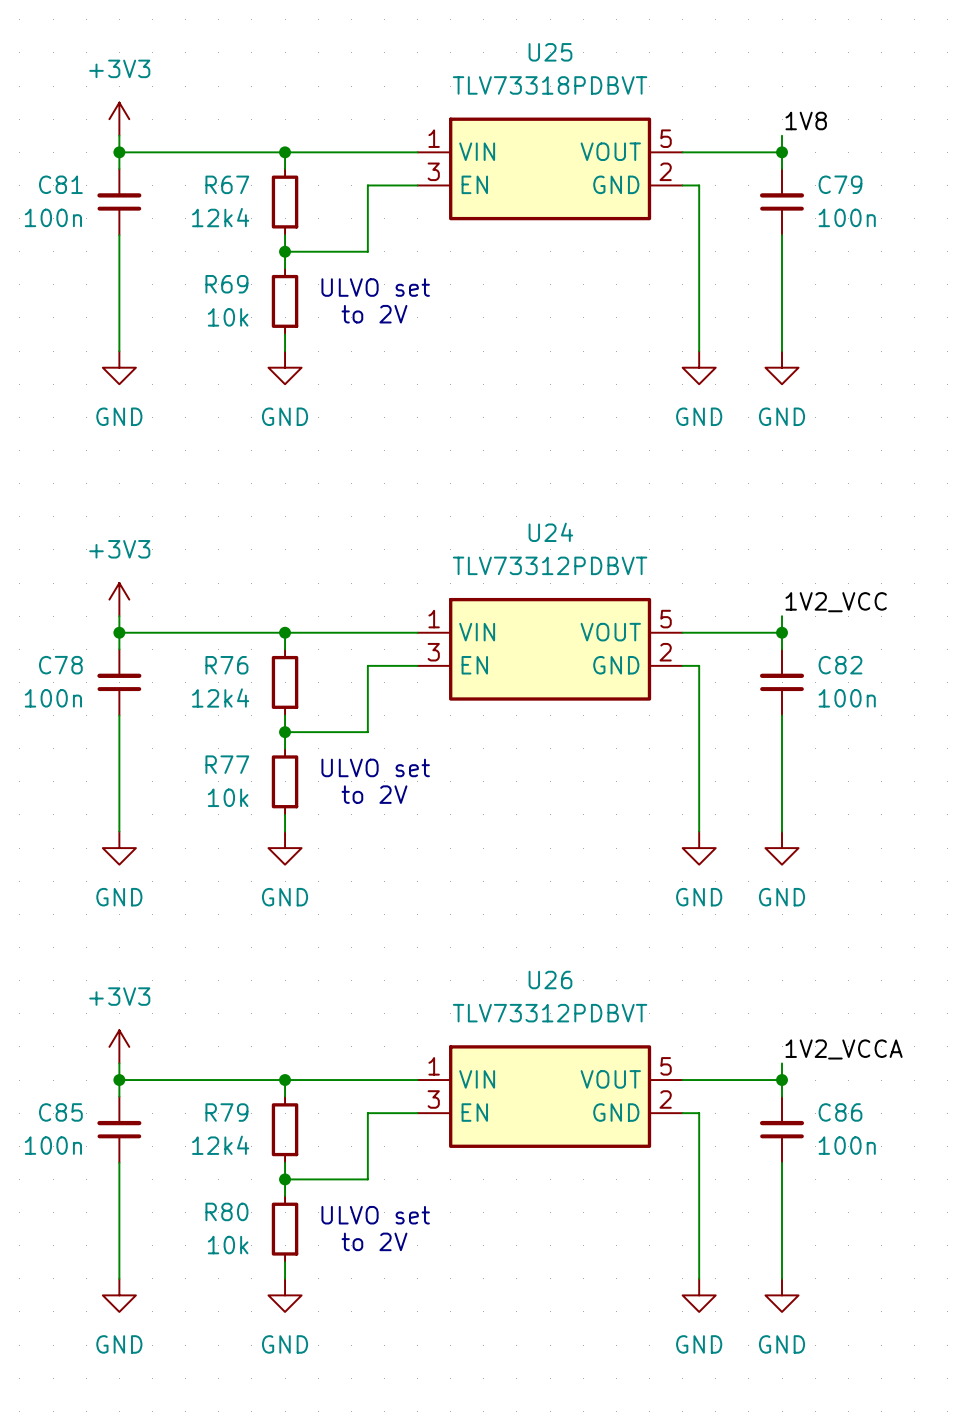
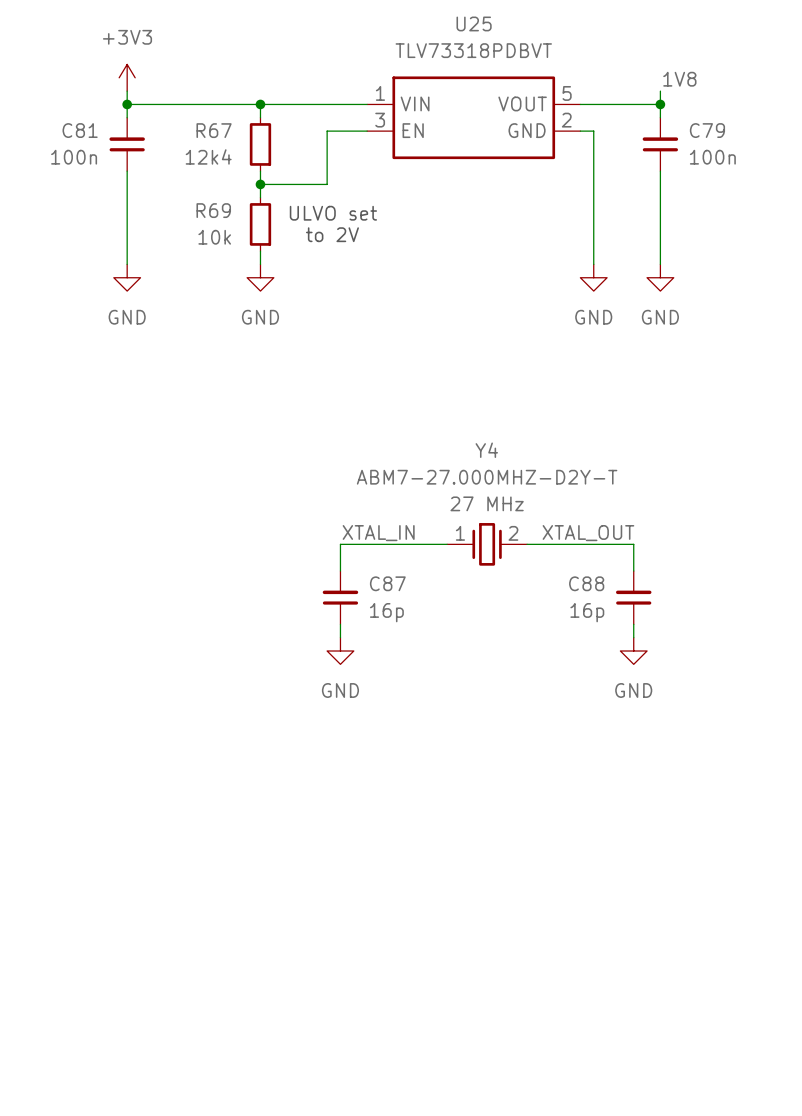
power symbol: +3V3 (119, 599) -> none
label: 1V2_VCC (836, 602) -> none
wire: (119, 616) (119, 649) -> none
wire: (782, 616) (782, 649) -> none
wire: (119, 632) (417, 632) -> none
junction: (119, 632) -> none
wire: (285, 632) (285, 649) -> none
junction: (285, 632) -> none
wire: (682, 632) (782, 632) -> none
junction: (782, 632) -> none
U24: (550, 649) -> none
wire: (417, 665) (367, 665) (367, 732) (285, 732) -> none
wire: (682, 665) (699, 665) (699, 831) -> none
C78: (119, 682) -> none
R76: (285, 682) -> none
C82: (782, 682) -> none
label: none -> XTAL_IN (378, 533)
label: none -> XTAL_OUT (588, 533)
wire: none -> (447, 544) (340, 544) (340, 571)
Y4: none -> (487, 544)
wire: none -> (527, 544) (633, 544) (633, 571)
wire: (119, 715) (119, 831) -> none
wire: (285, 715) (285, 748) -> none
wire: (782, 715) (782, 831) -> none
junction: (285, 732) -> none
C87: none -> (340, 597)
C88: none -> (633, 597)
text: ULVO set (375, 767) -> none
R77: (285, 781) -> none
text: to 2V (374, 794) -> none
wire: none -> (633, 624) (633, 637)
wire: (285, 814) (285, 831) -> (340, 624) (340, 637)
power symbol: none -> GND (633, 651)
power symbol: GND (119, 848) -> none
power symbol position: GND (285, 848) -> GND (340, 651)
power symbol: GND (699, 848) -> none
power symbol: GND (782, 848) -> none
power symbol: +3V3 (119, 1046) -> none
label: 1V2_VCCA (844, 1049) -> none
wire: (119, 1063) (119, 1096) -> none
wire: (782, 1063) (782, 1096) -> none
wire: (119, 1080) (417, 1080) -> none
junction: (119, 1080) -> none
wire: (285, 1080) (285, 1096) -> none
junction: (285, 1080) -> none
wire: (682, 1080) (782, 1080) -> none
junction: (782, 1080) -> none
U26: (550, 1096) -> none
wire: (417, 1113) (367, 1113) (367, 1179) (285, 1179) -> none
wire: (682, 1113) (699, 1113) (699, 1278) -> none
C85: (119, 1129) -> none
R79: (285, 1129) -> none
C86: (782, 1129) -> none
wire: (119, 1162) (119, 1278) -> none
wire: (285, 1162) (285, 1195) -> none
wire: (782, 1162) (782, 1278) -> none
junction: (285, 1179) -> none
text: ULVO set (375, 1215) -> none
R80: (285, 1229) -> none
text: to 2V (374, 1241) -> none
wire: (285, 1262) (285, 1278) -> none
power symbol: GND (119, 1295) -> none
power symbol: GND (285, 1295) -> none
power symbol: GND (699, 1295) -> none
power symbol: GND (782, 1295) -> none

